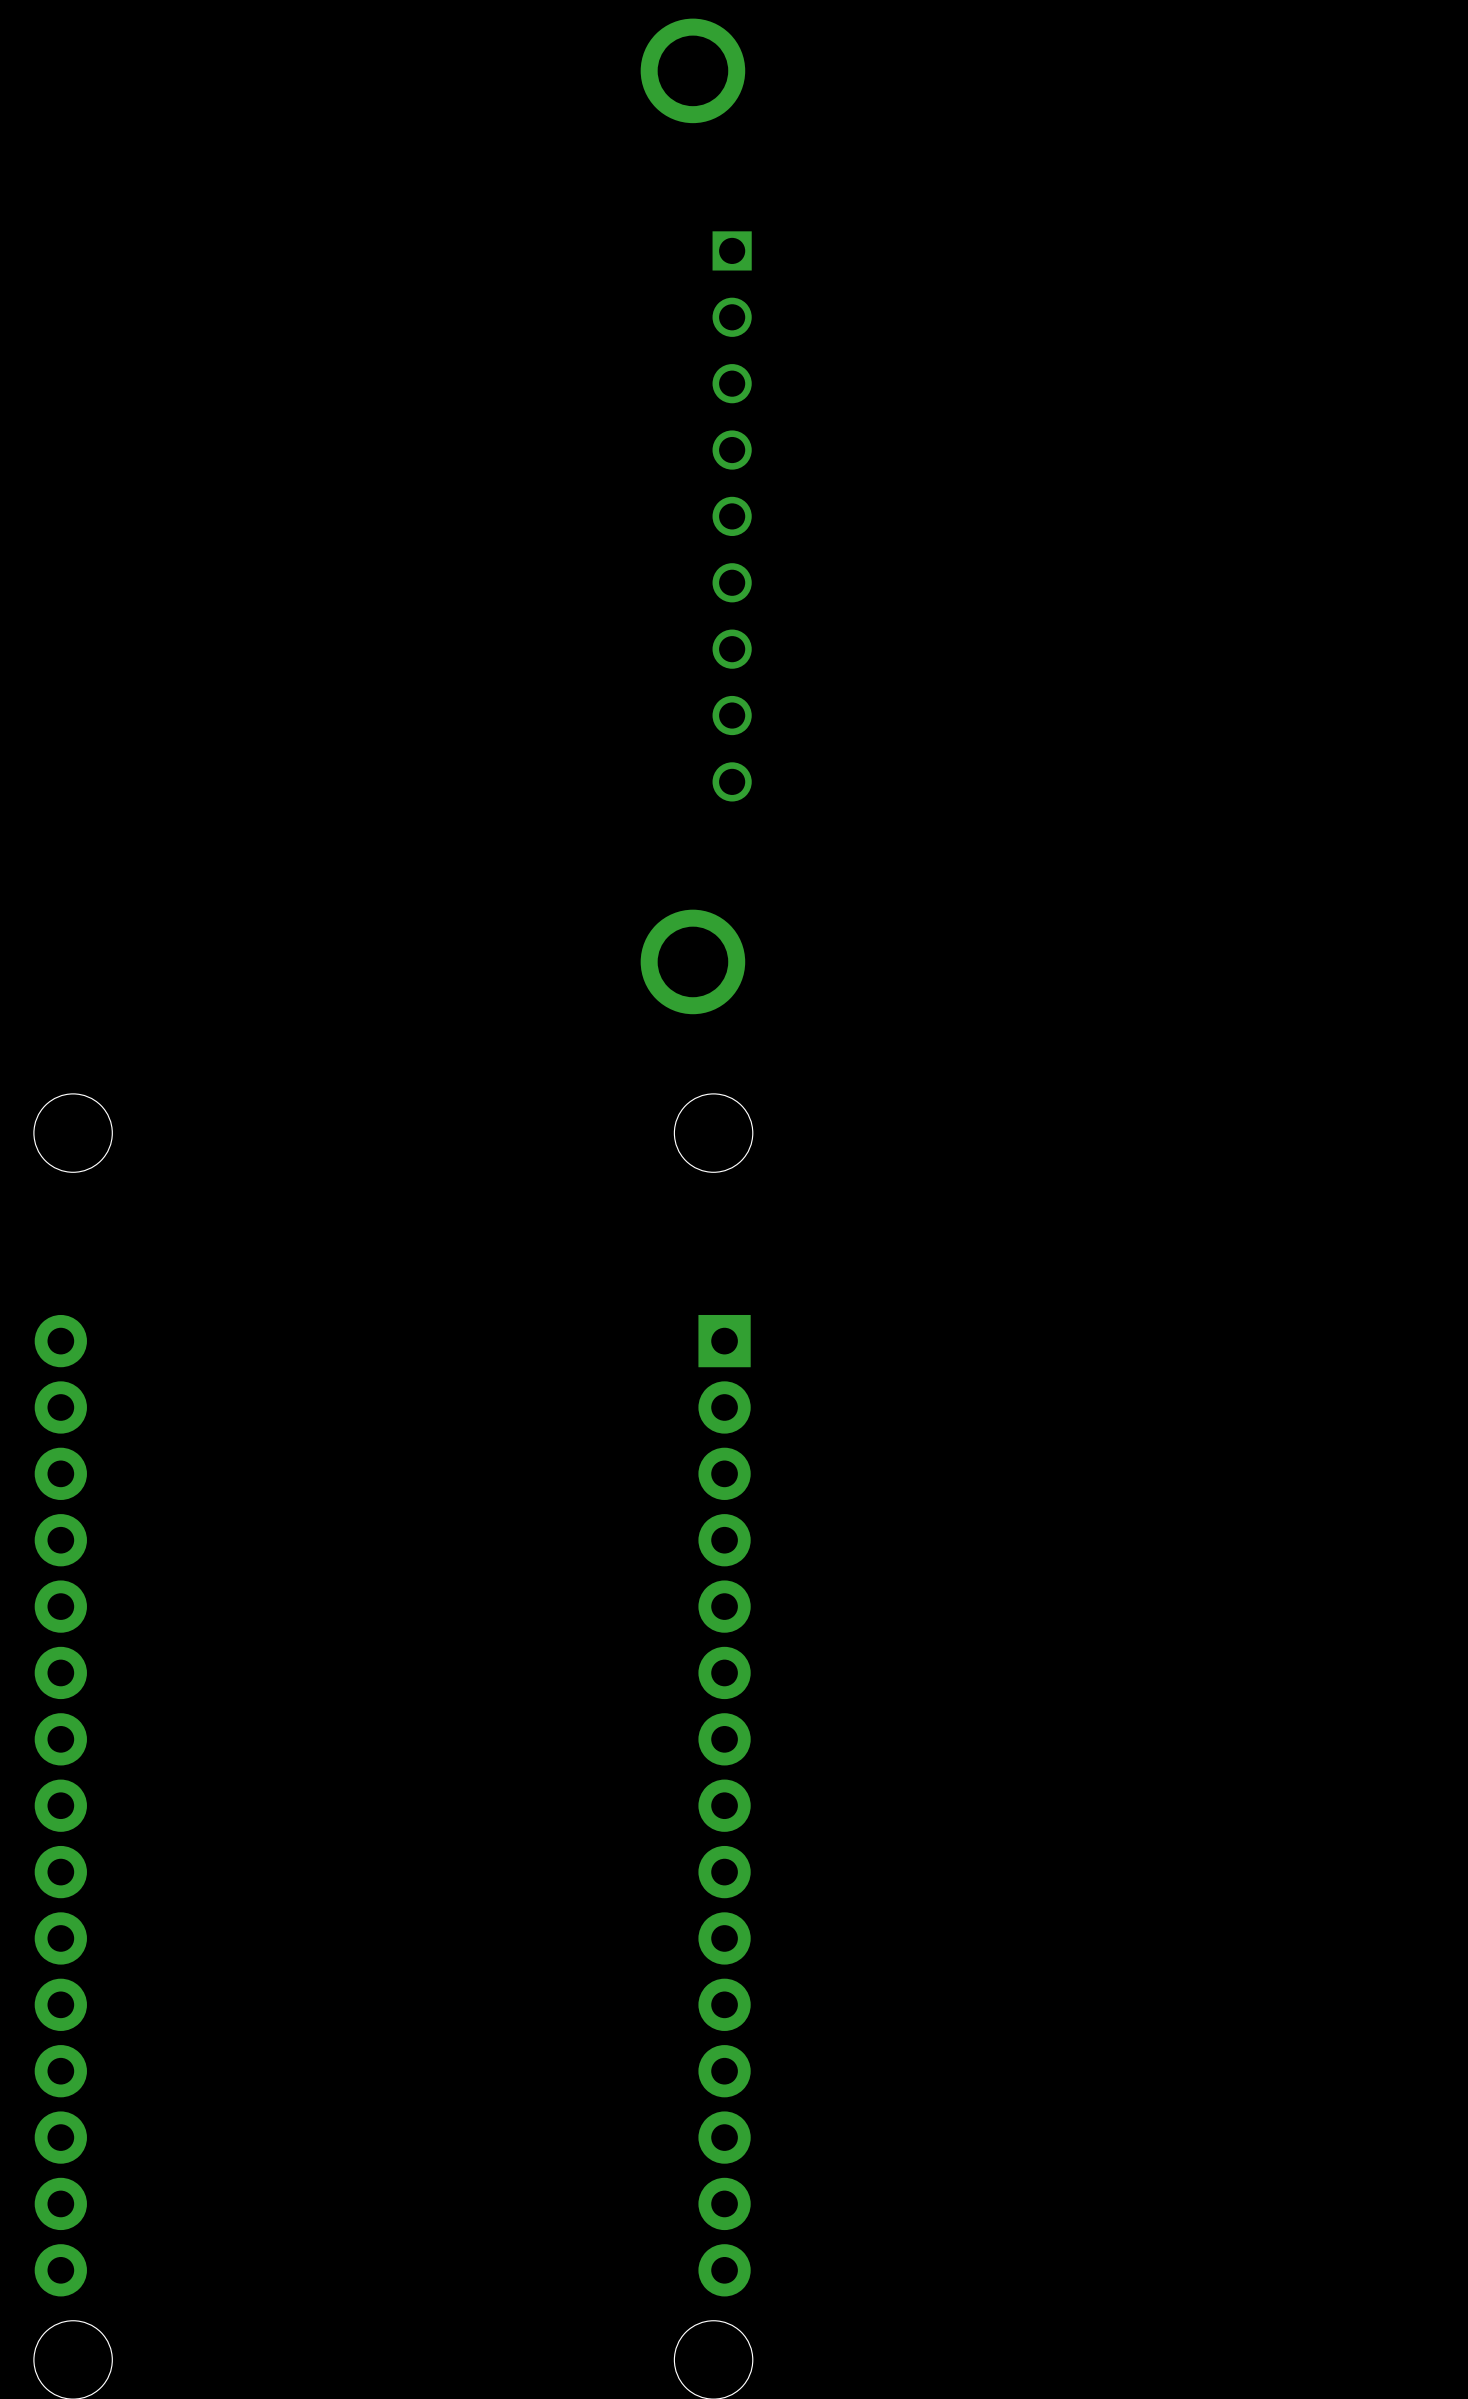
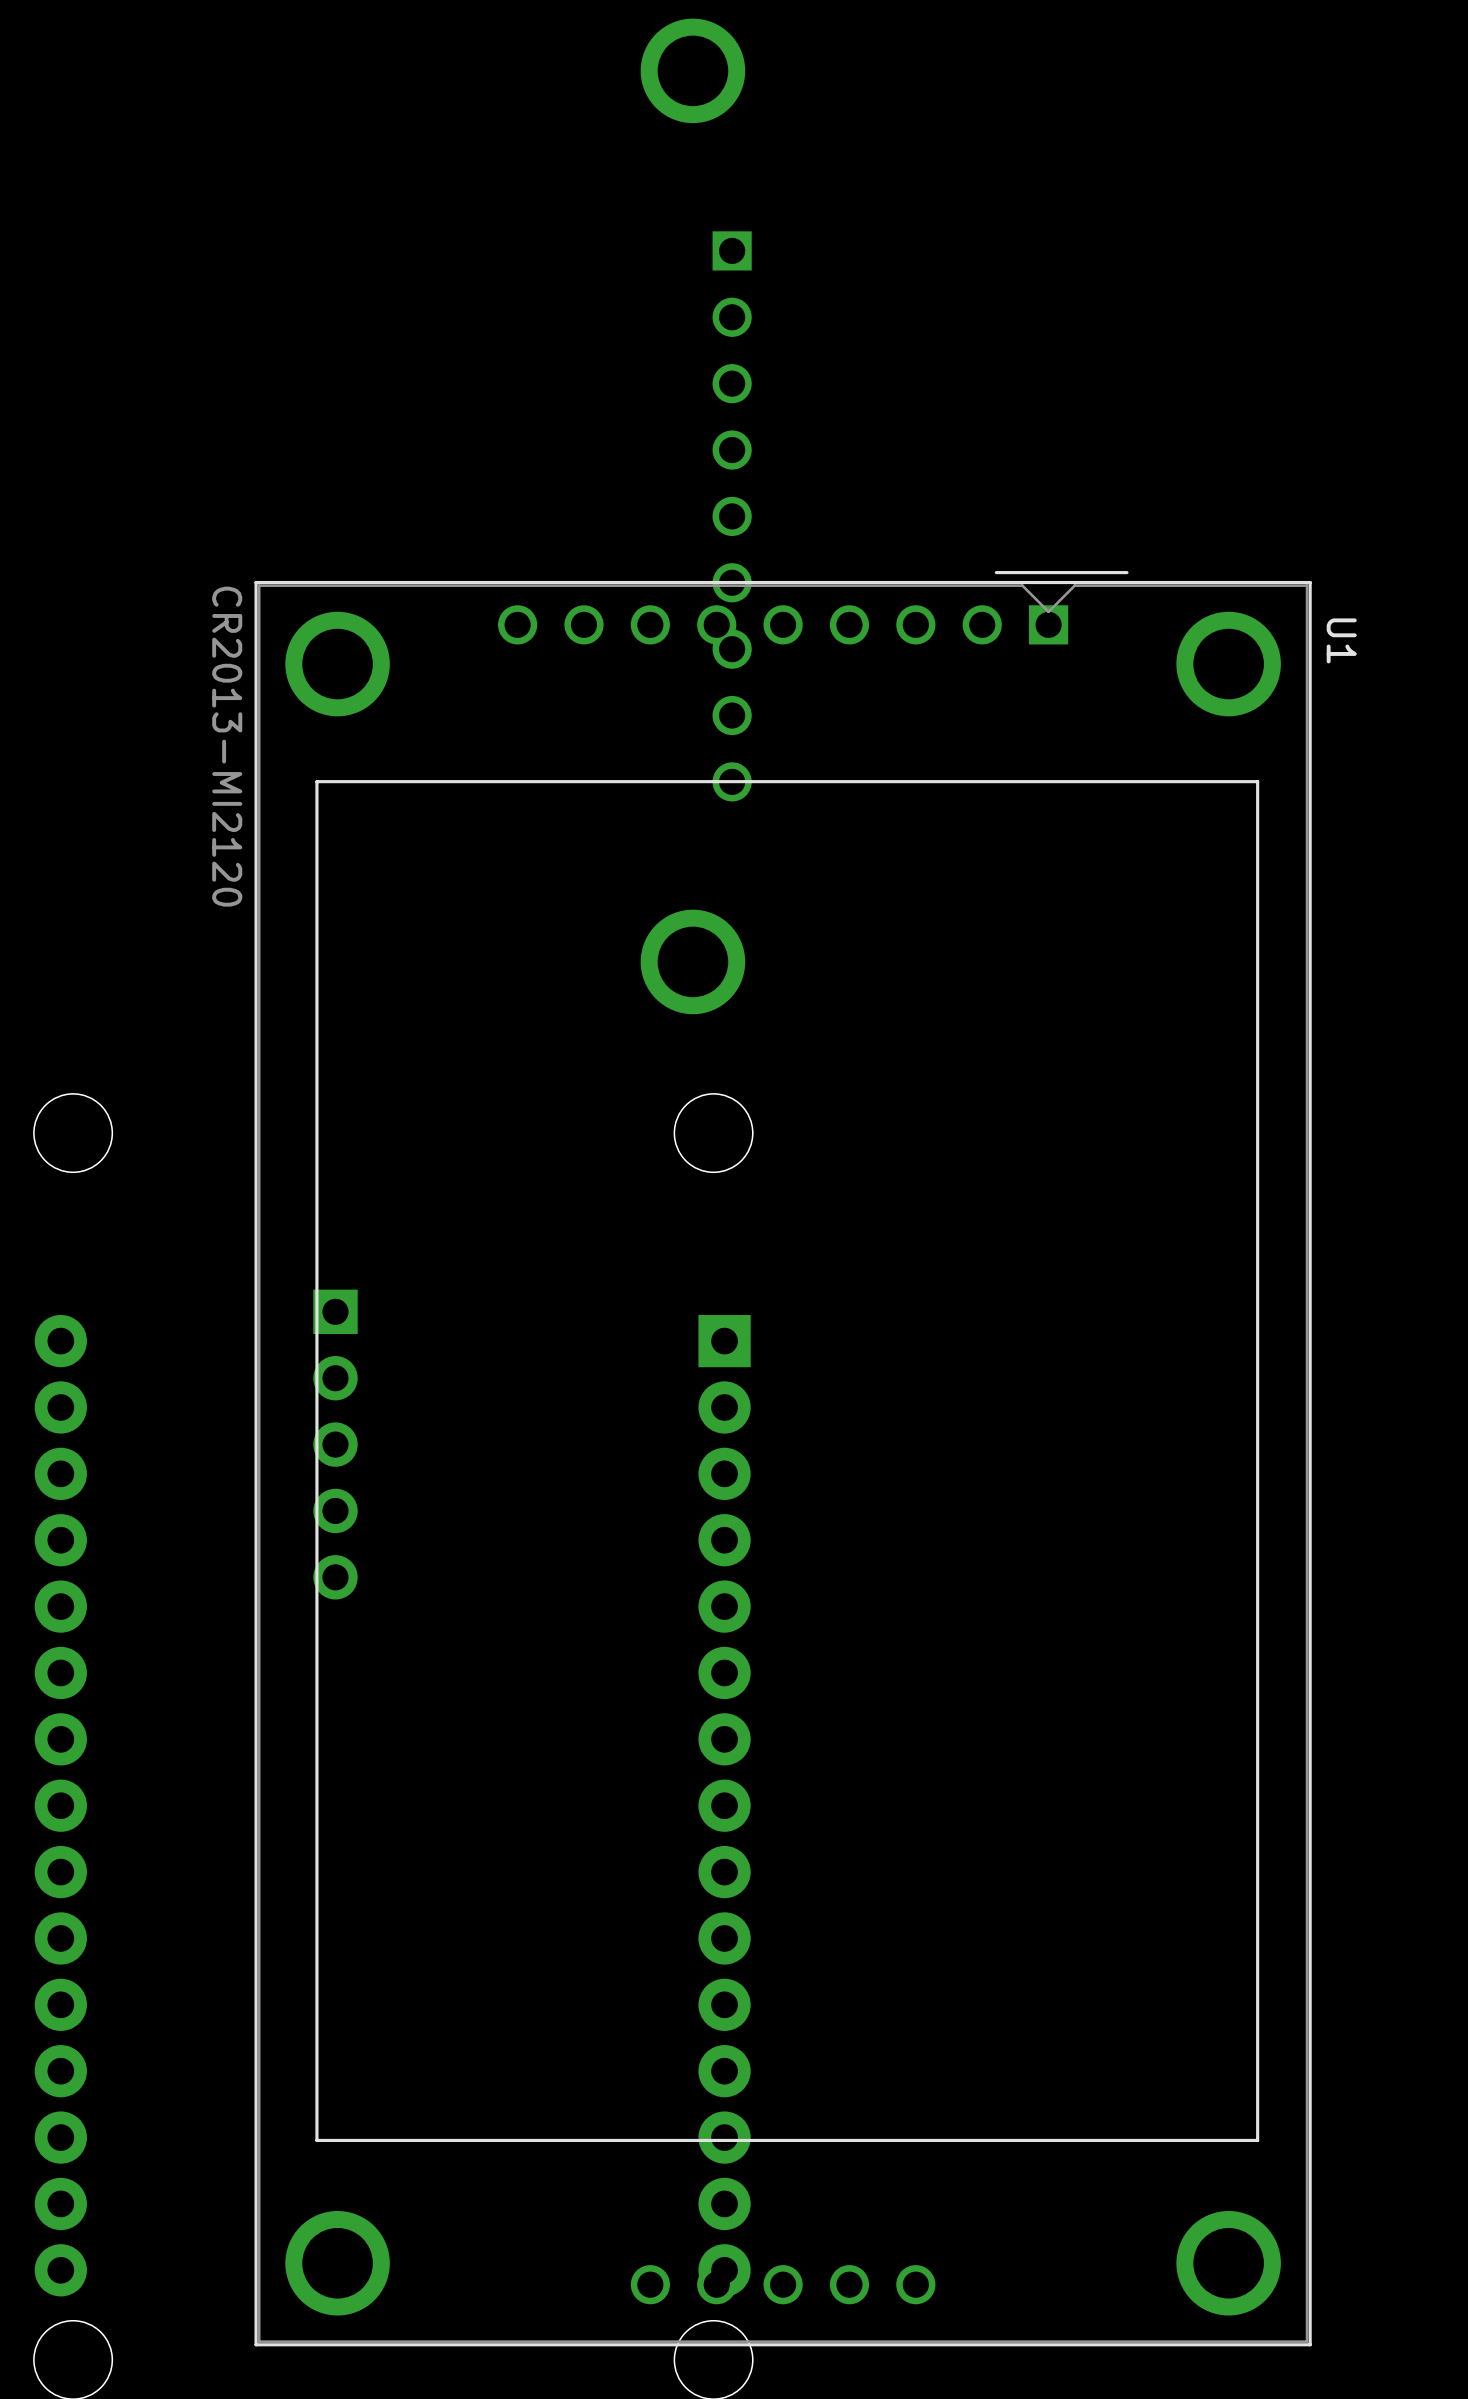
part: none -> (335, 1444)
U1: none -> CR2013-MI2120 (783, 1458)

